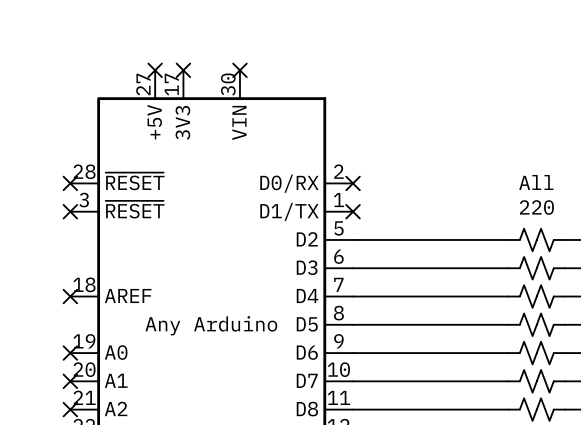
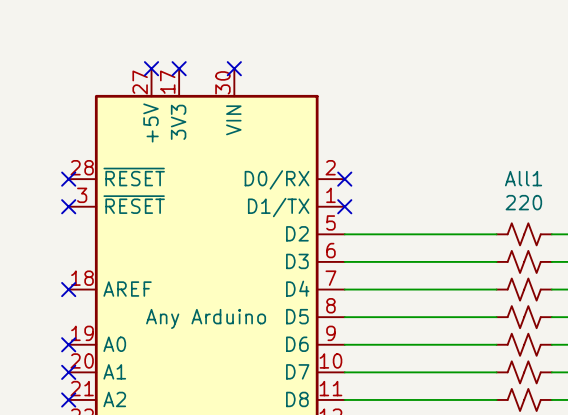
All name: All (536, 182) -> All1 (523, 178)

